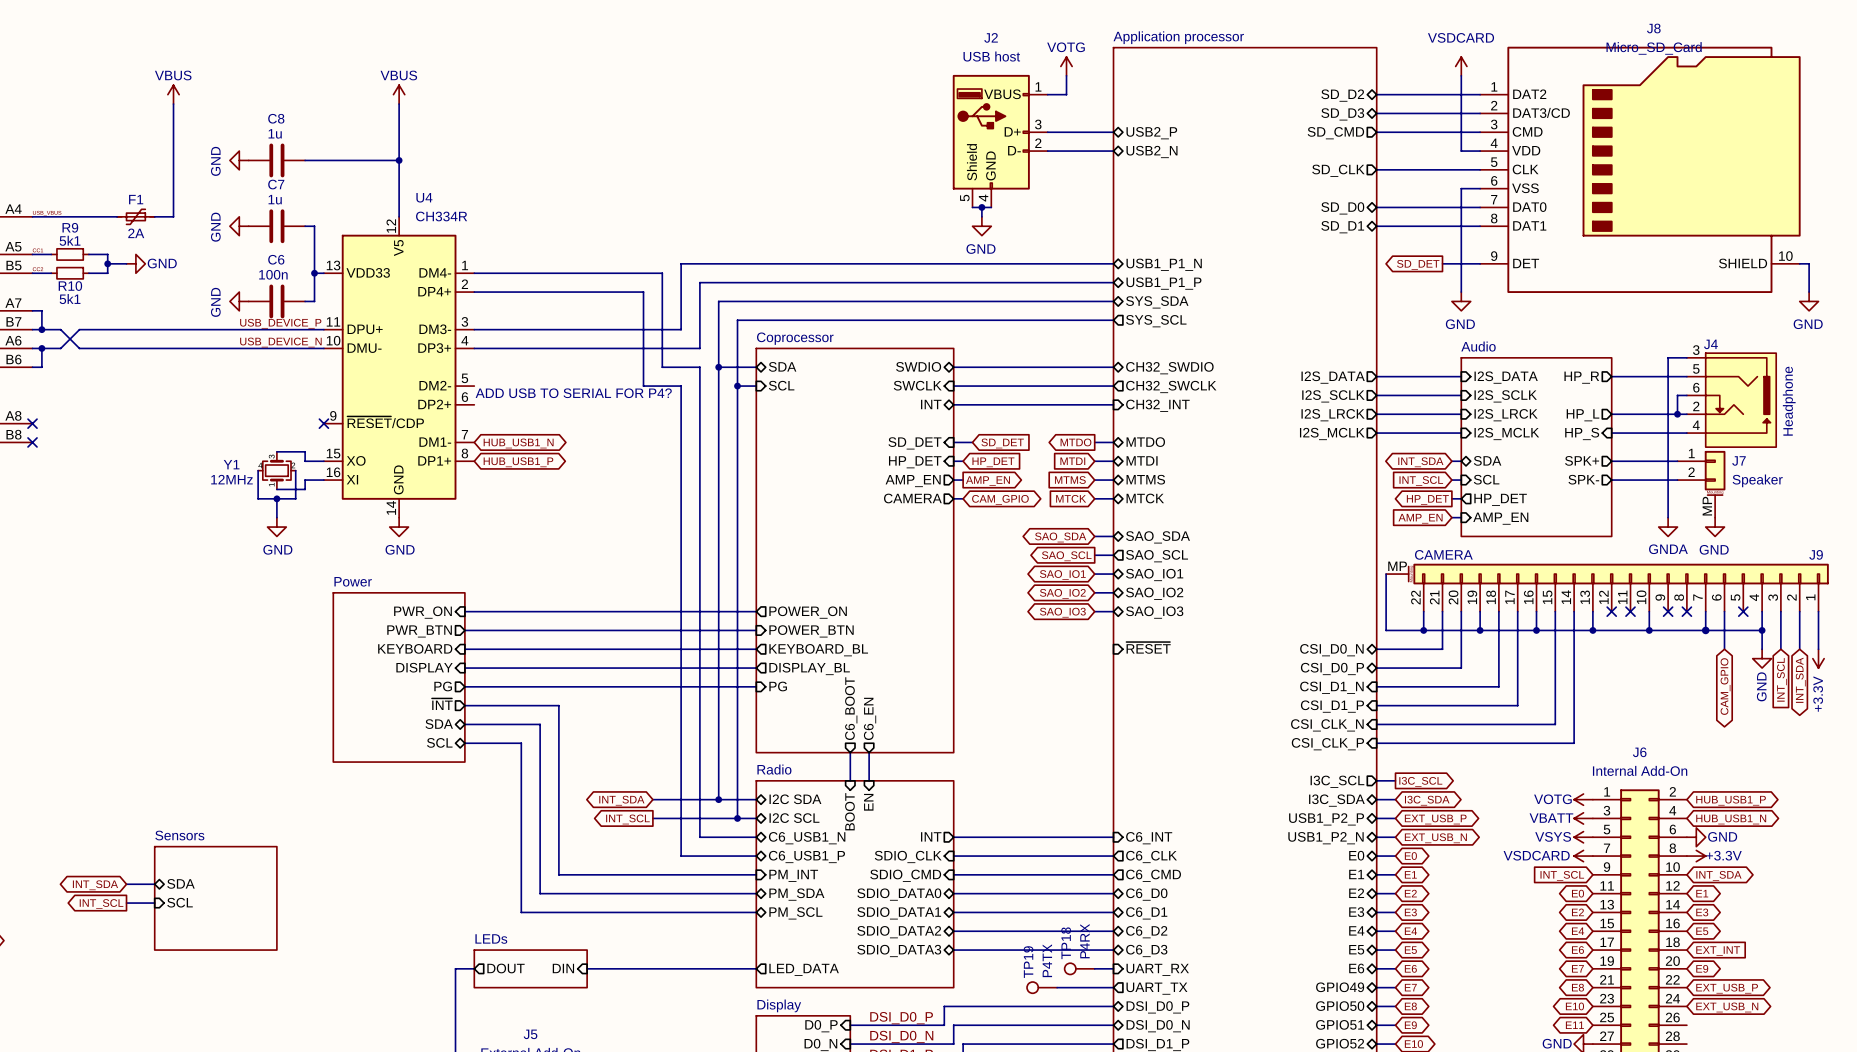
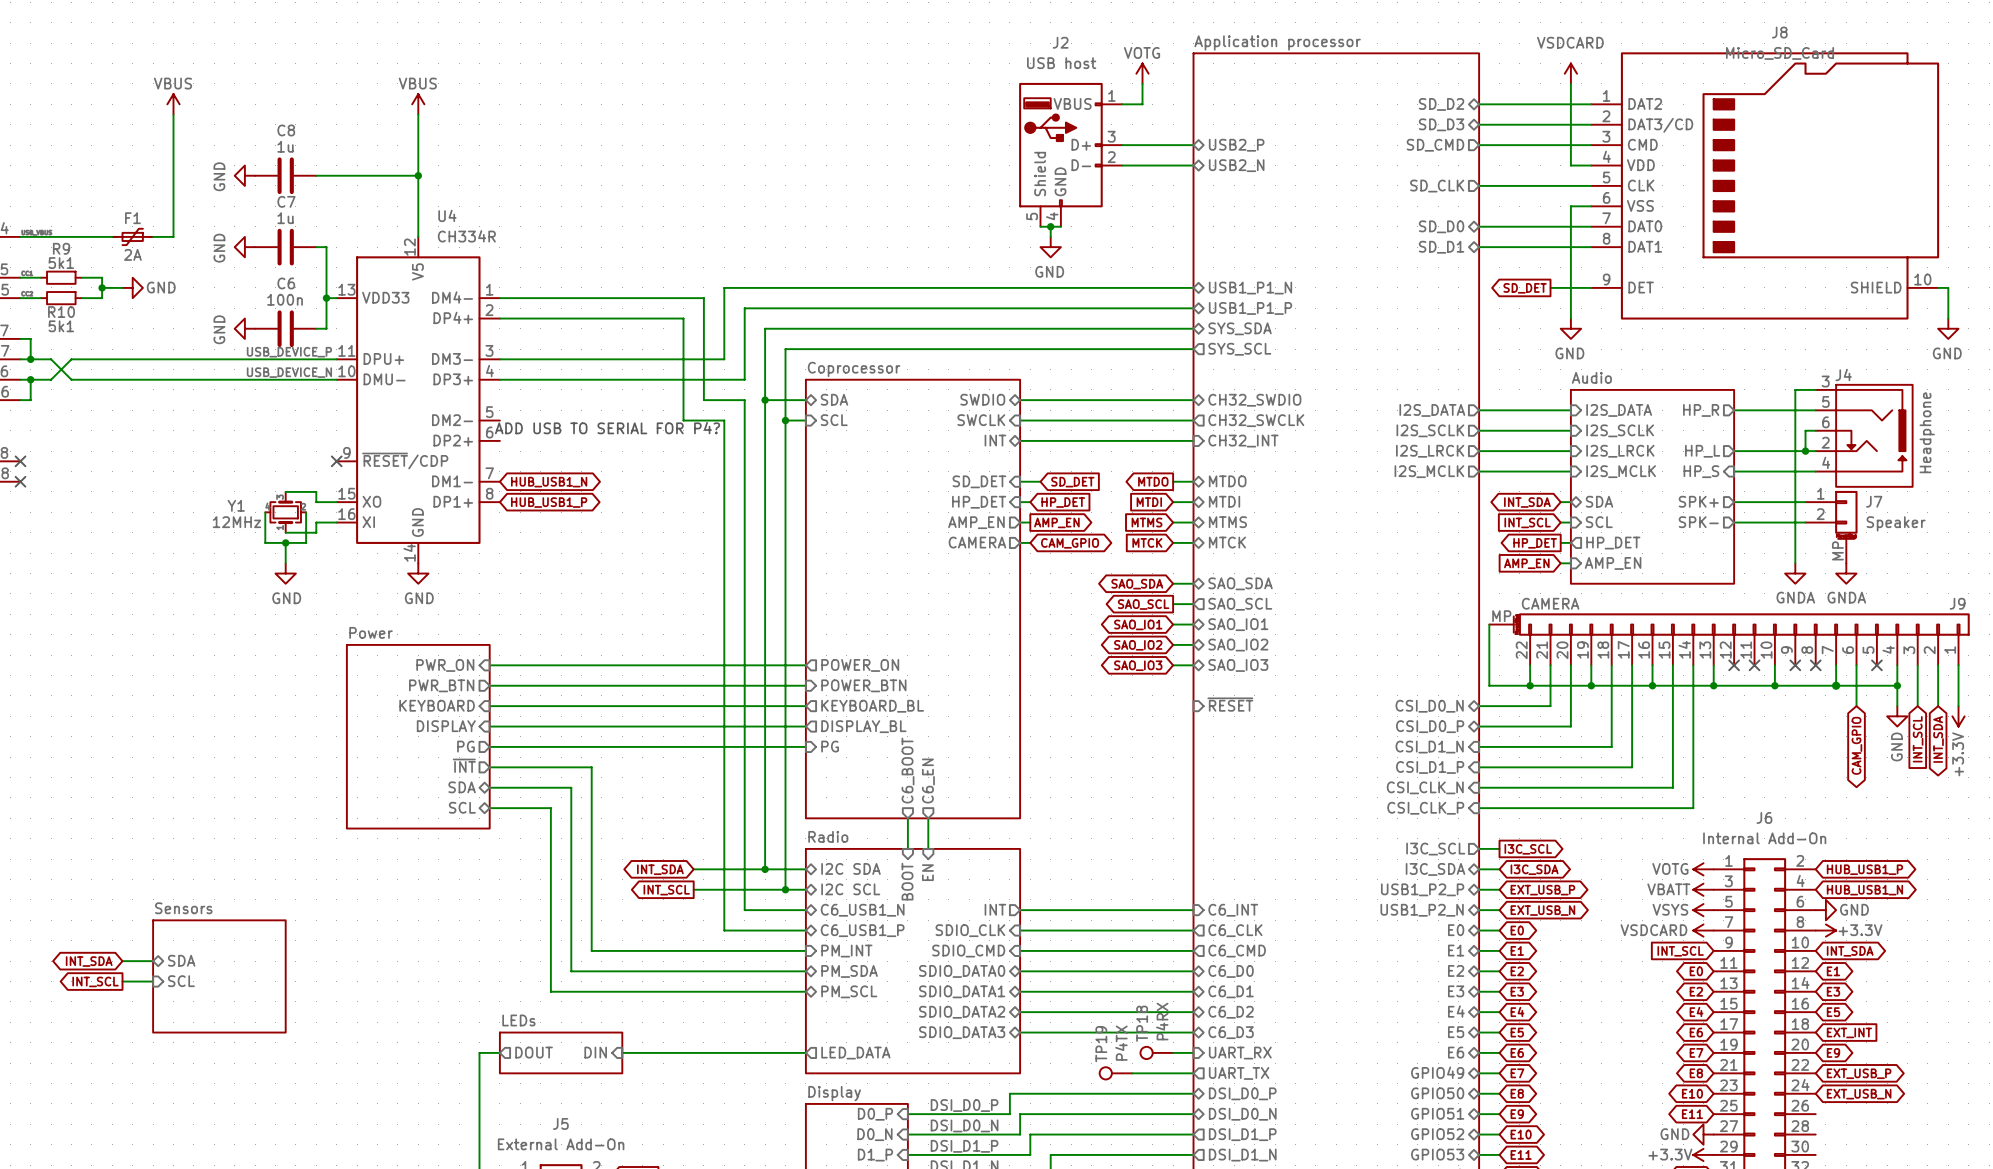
power symbol: GND (1715, 527) -> GNDA (1846, 573)

